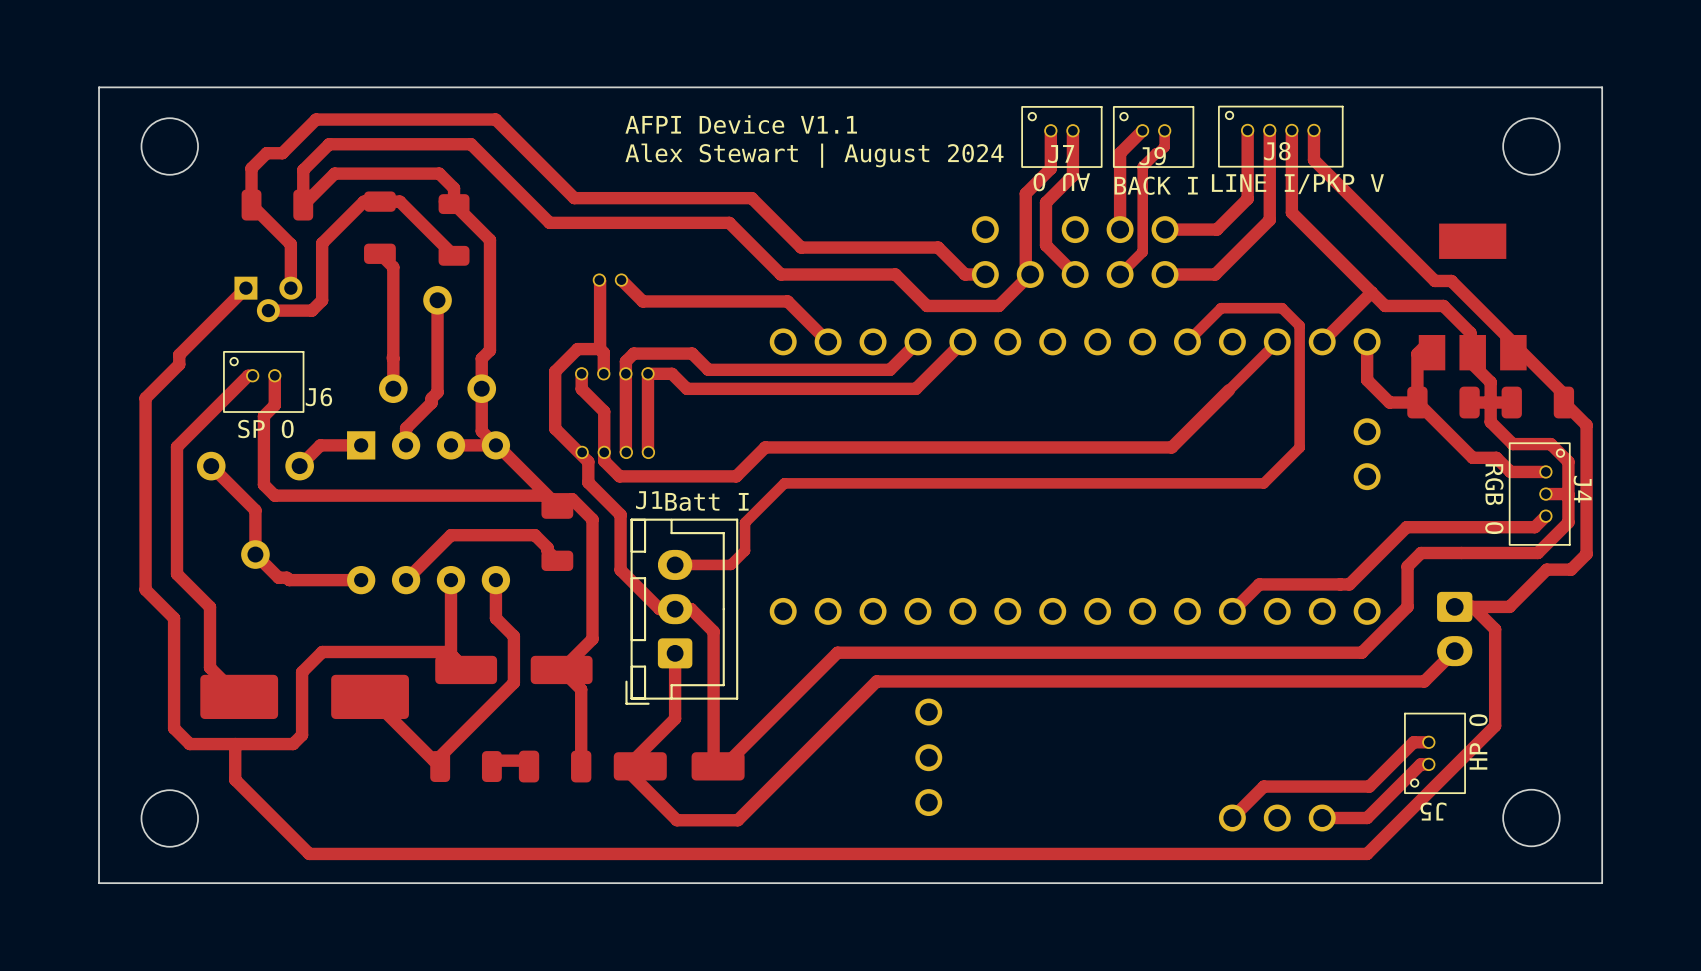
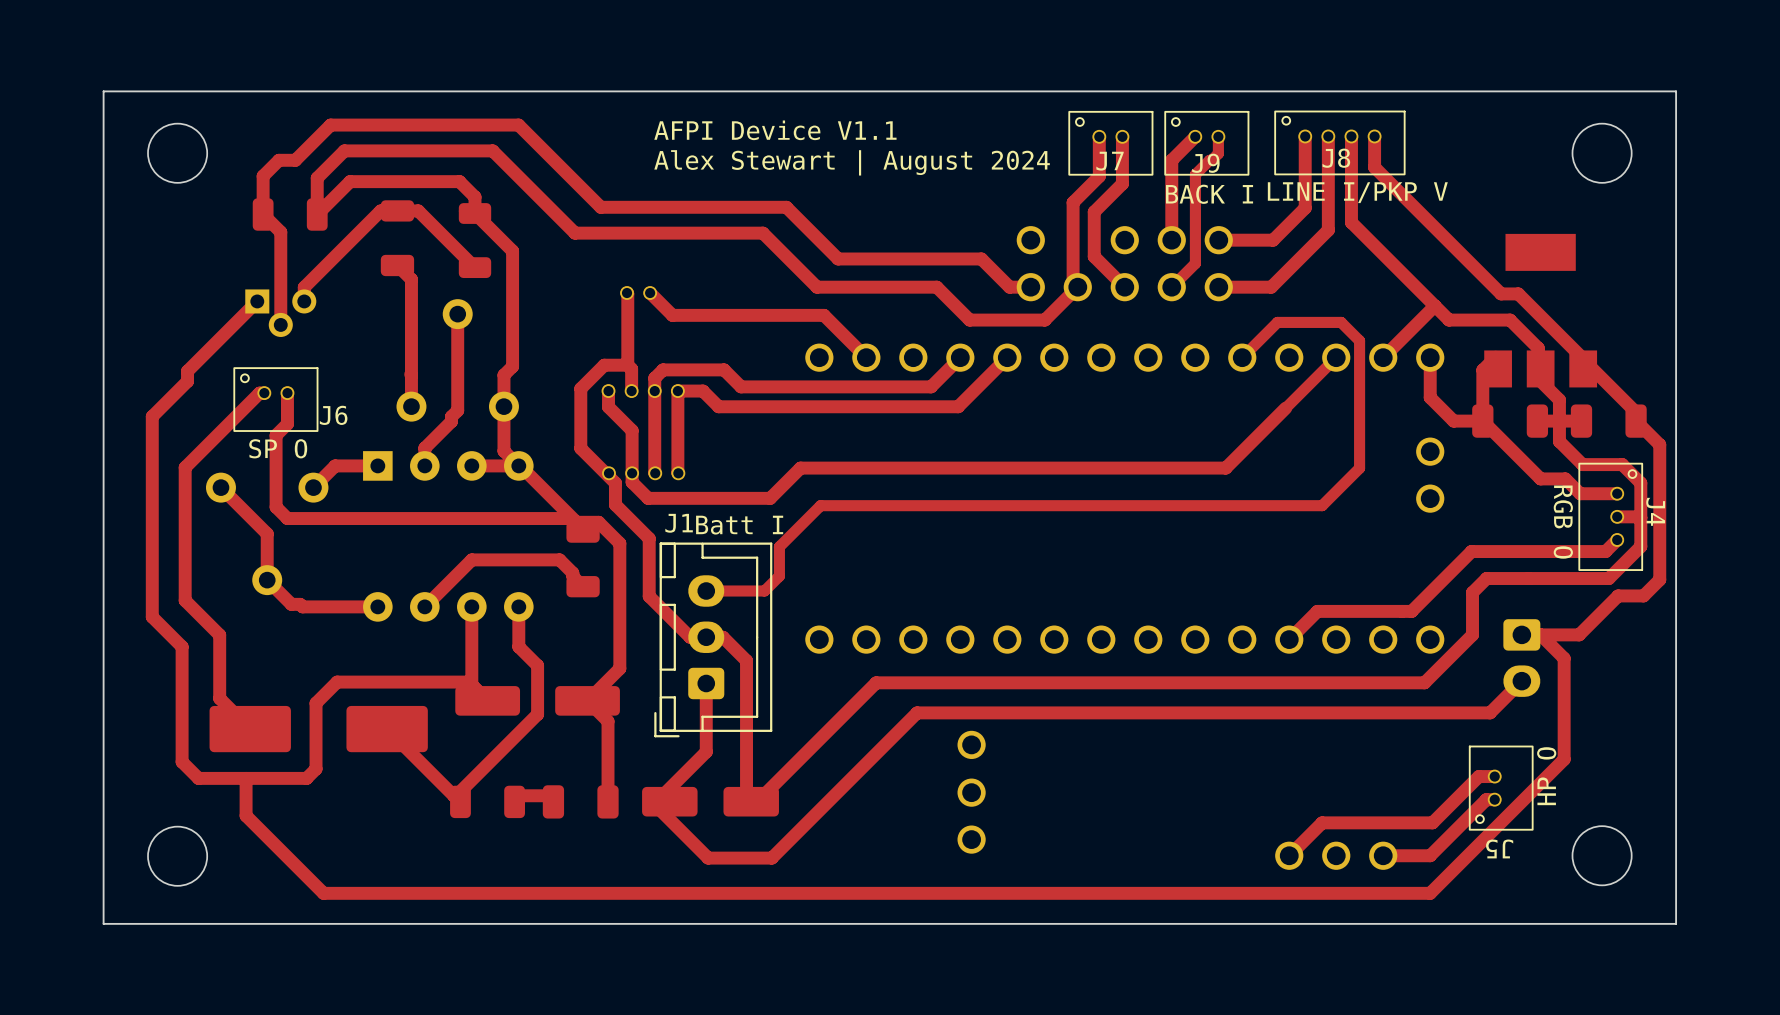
J7 value: AU O (1061, 182) -> none
top track: (268, 221) (290, 244) (290, 274) -> (280, 232) (280, 324)
top track: (322, 243) (322, 300) (311, 310) (268, 310) -> (337, 254) (304, 287)

